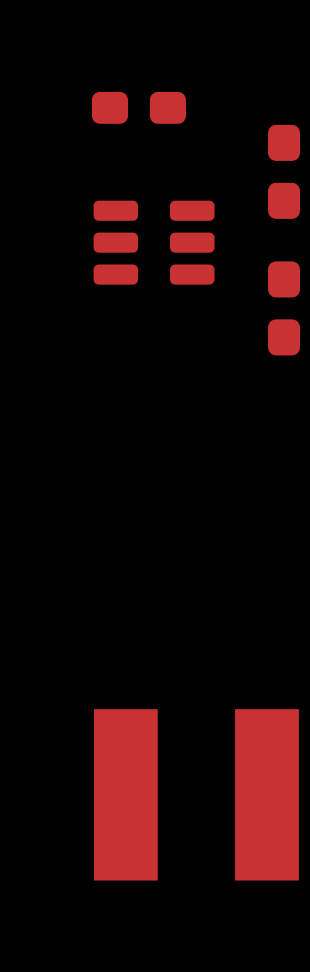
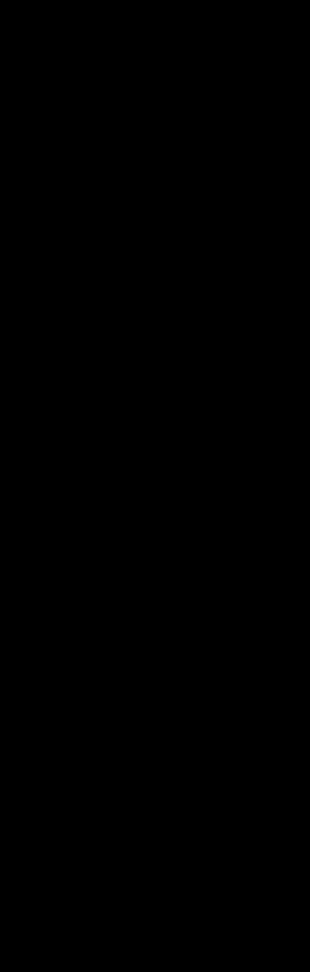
part: (138, 107) -> none
part: (284, 171) -> none
part: (154, 242) -> none
part: (284, 308) -> none
part: (196, 794) -> none

